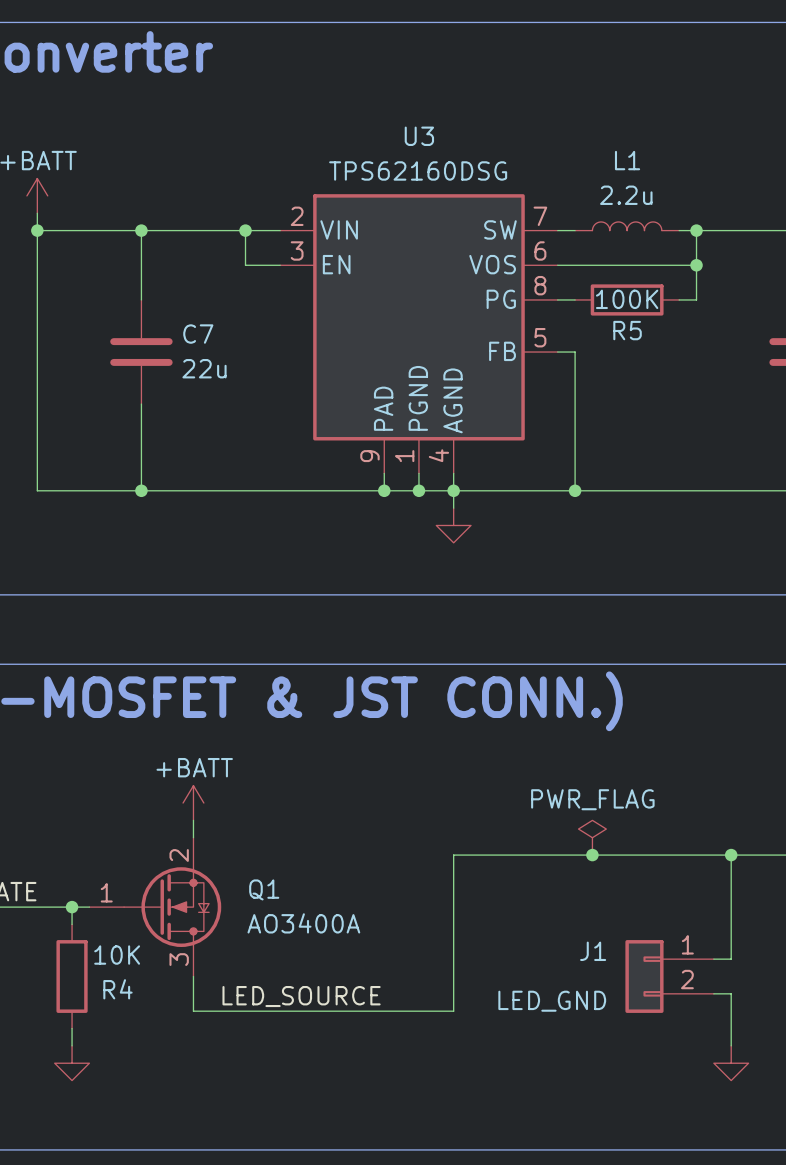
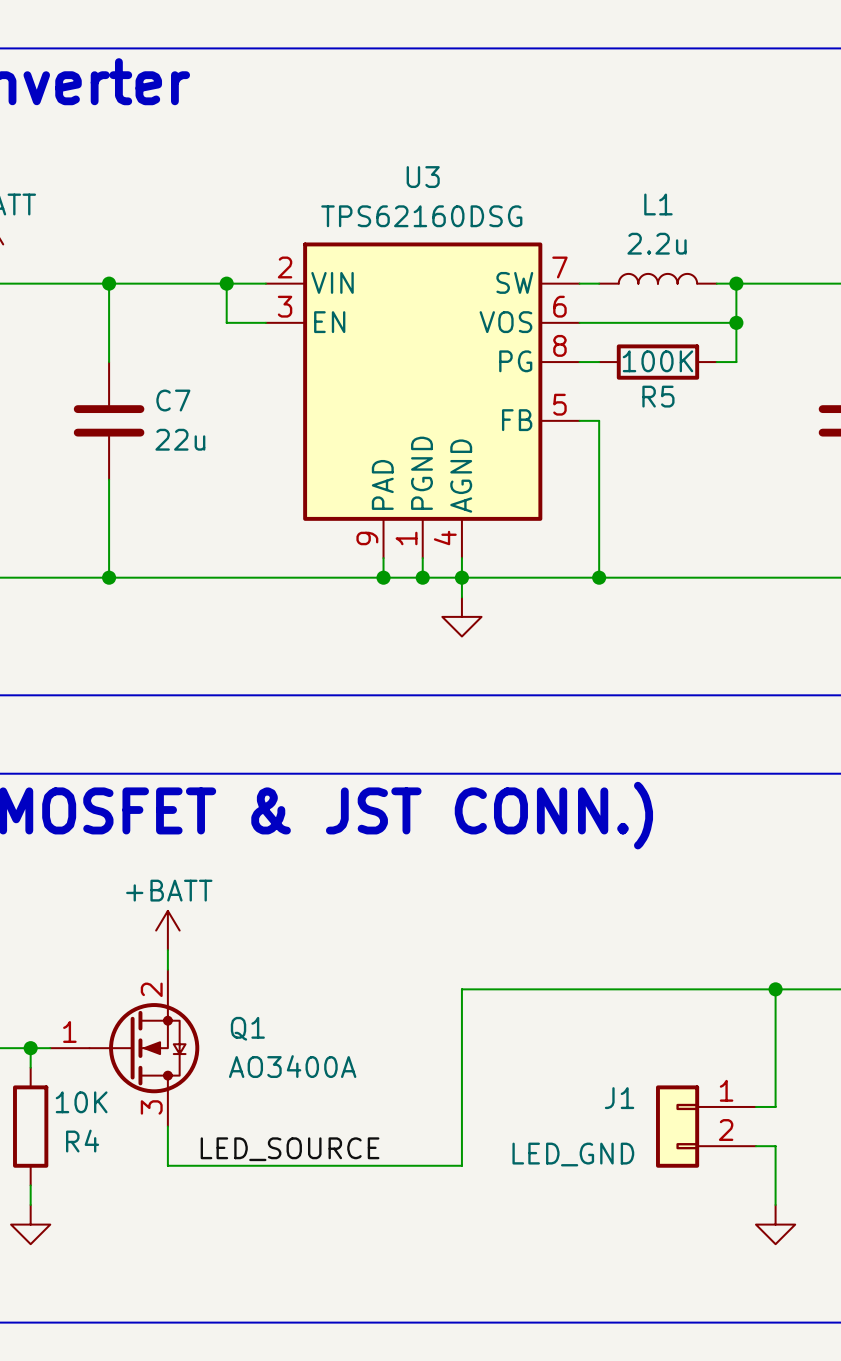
power symbol: PWR_FLAG (592, 837) -> none
junction: (592, 855) -> none

